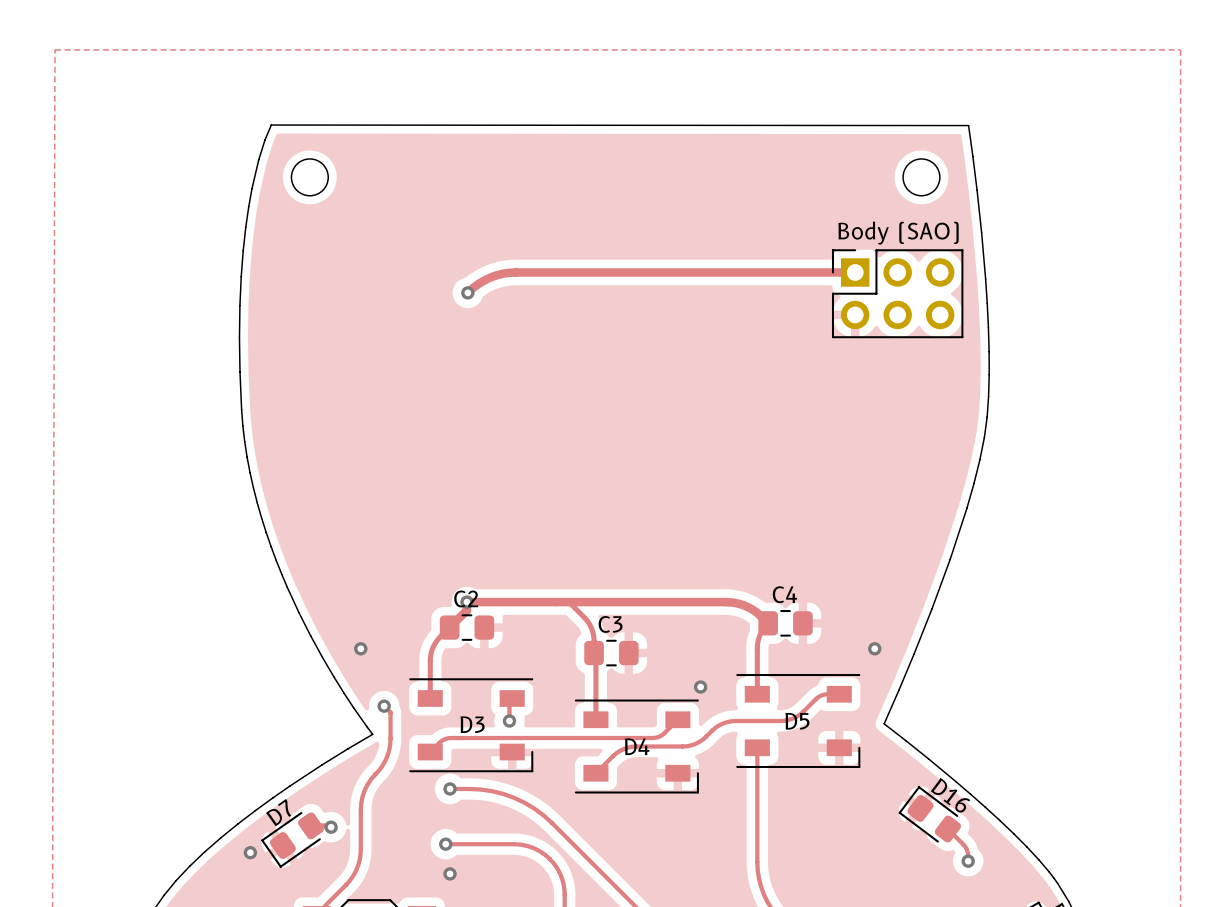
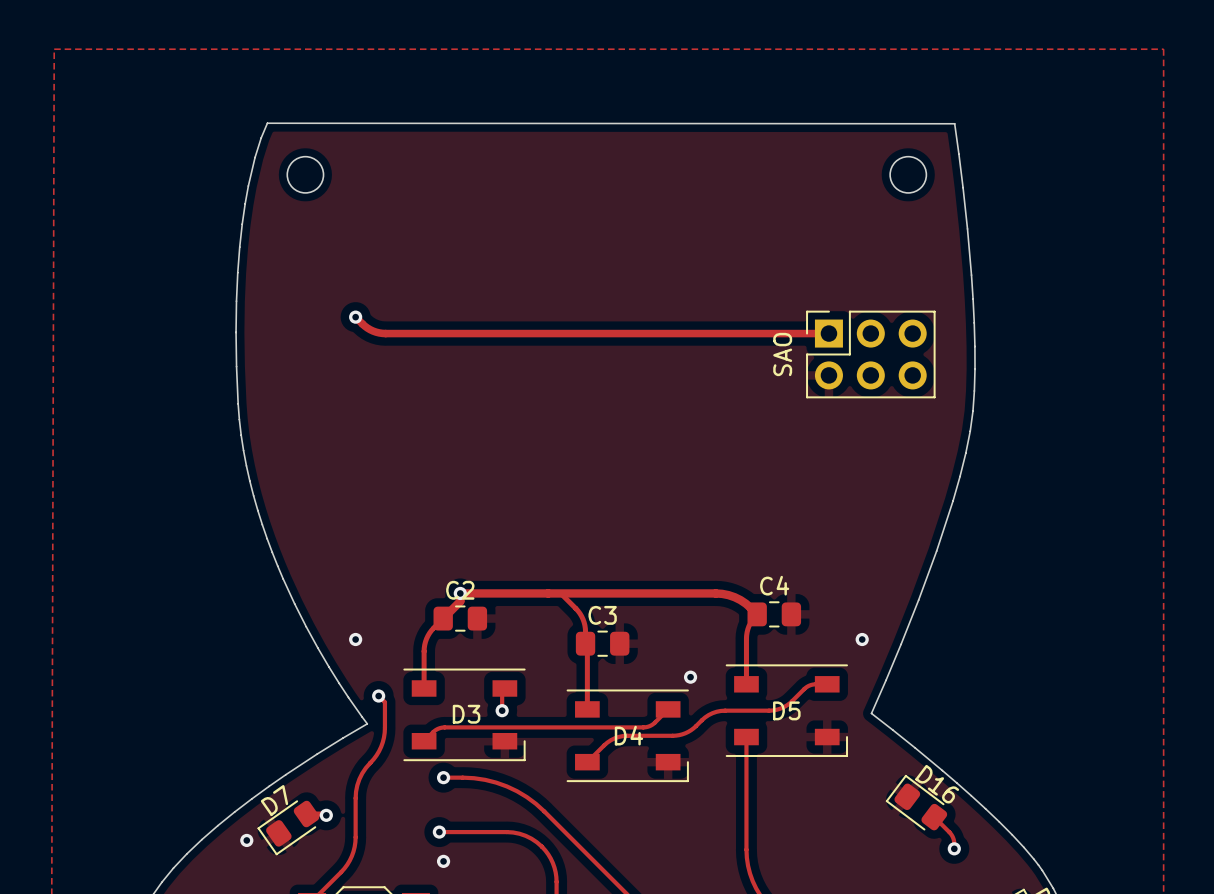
track: (855, 272) (509, 272) (484, 280) (467, 292) -> none
via: (467, 292) -> none
Body (SAO): (897, 293) -> none
track: none -> (355, 317) (370, 329) (385, 333) (828, 333)
via: none -> (355, 317)
SAO: none -> (870, 354)

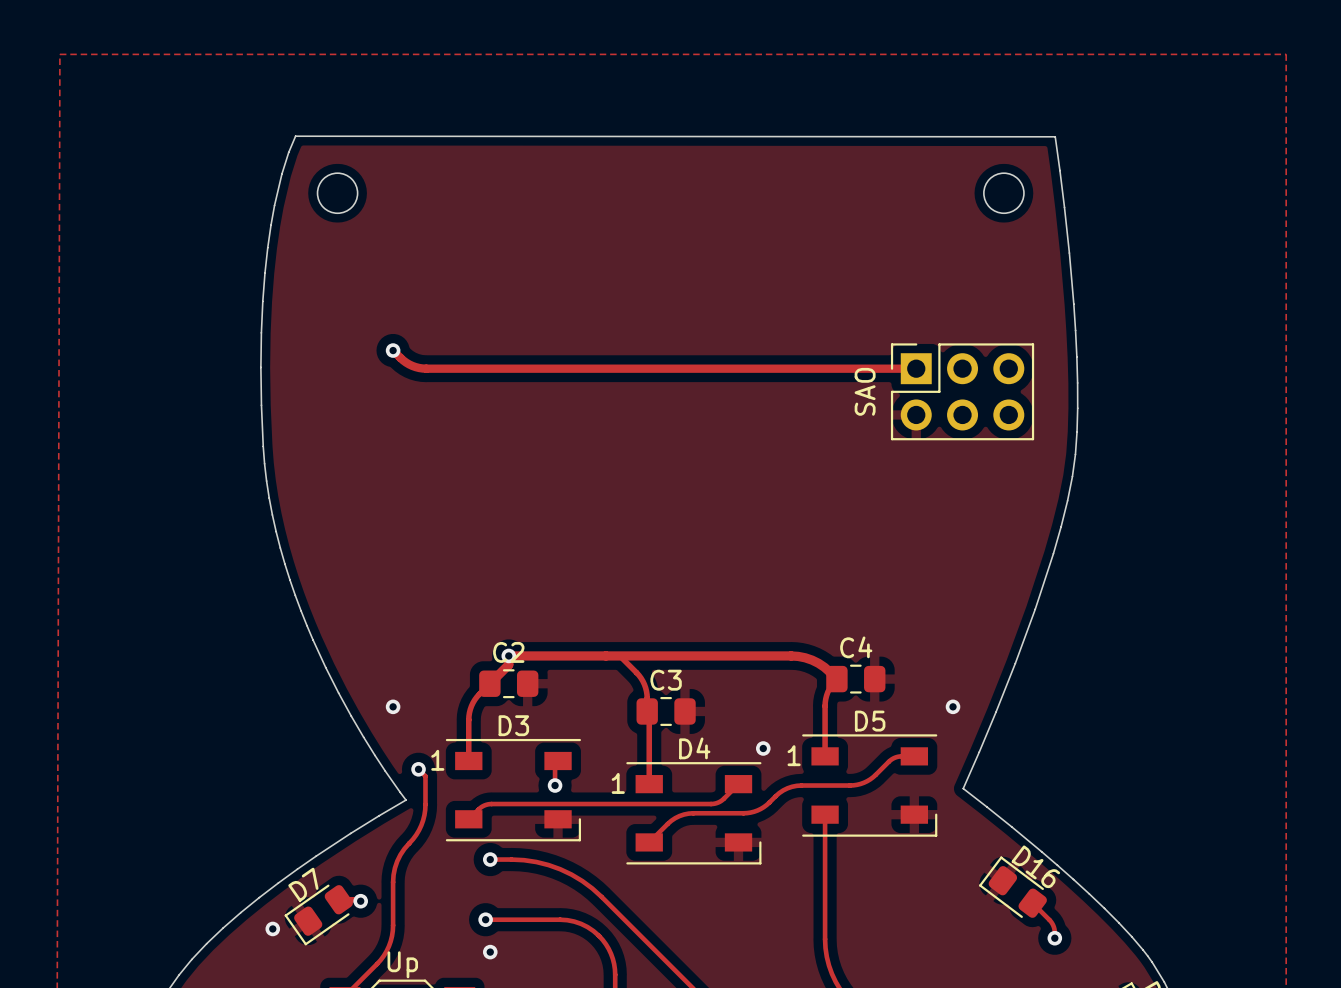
D5 text: none -> 1 (794, 755)
D3 text: none -> 1 (437, 760)
D4 text: none -> 1 (618, 783)
D5 name position: D5 (786, 710) -> D5 (870, 721)
D3 name position: D3 (466, 714) -> D3 (513, 725)
D4 name position: D4 (628, 735) -> D4 (694, 748)
Up name: none -> Up (402, 964)

